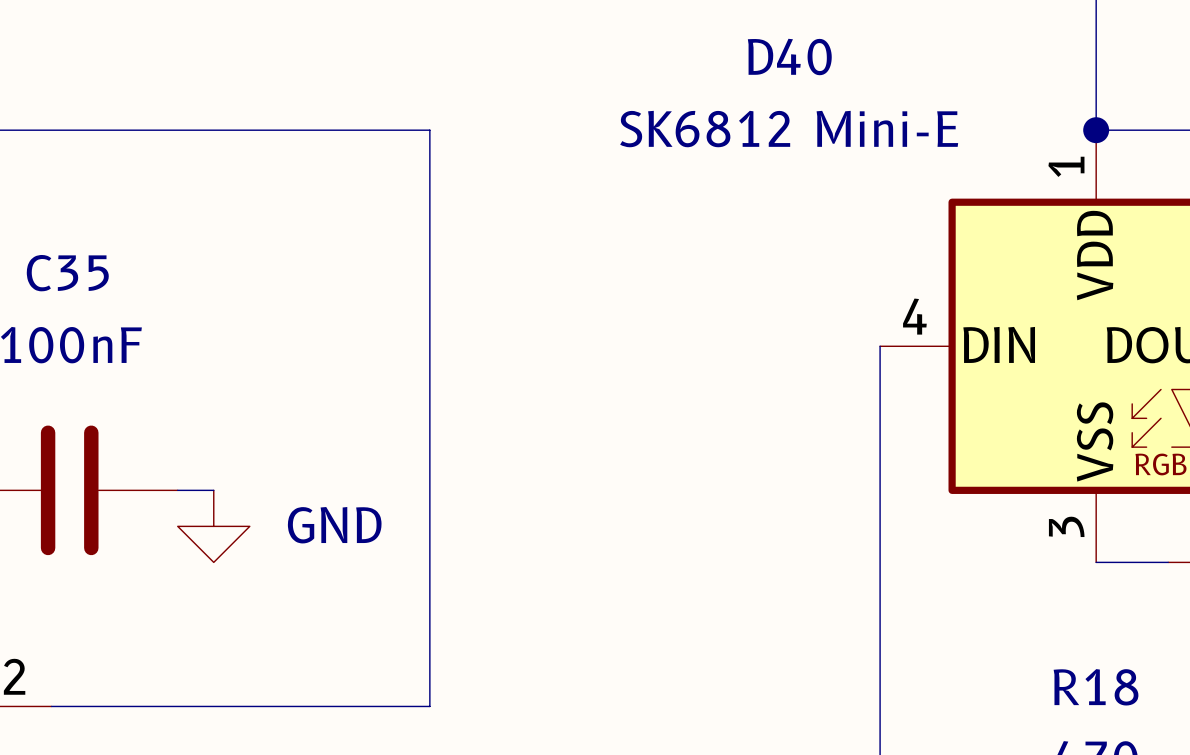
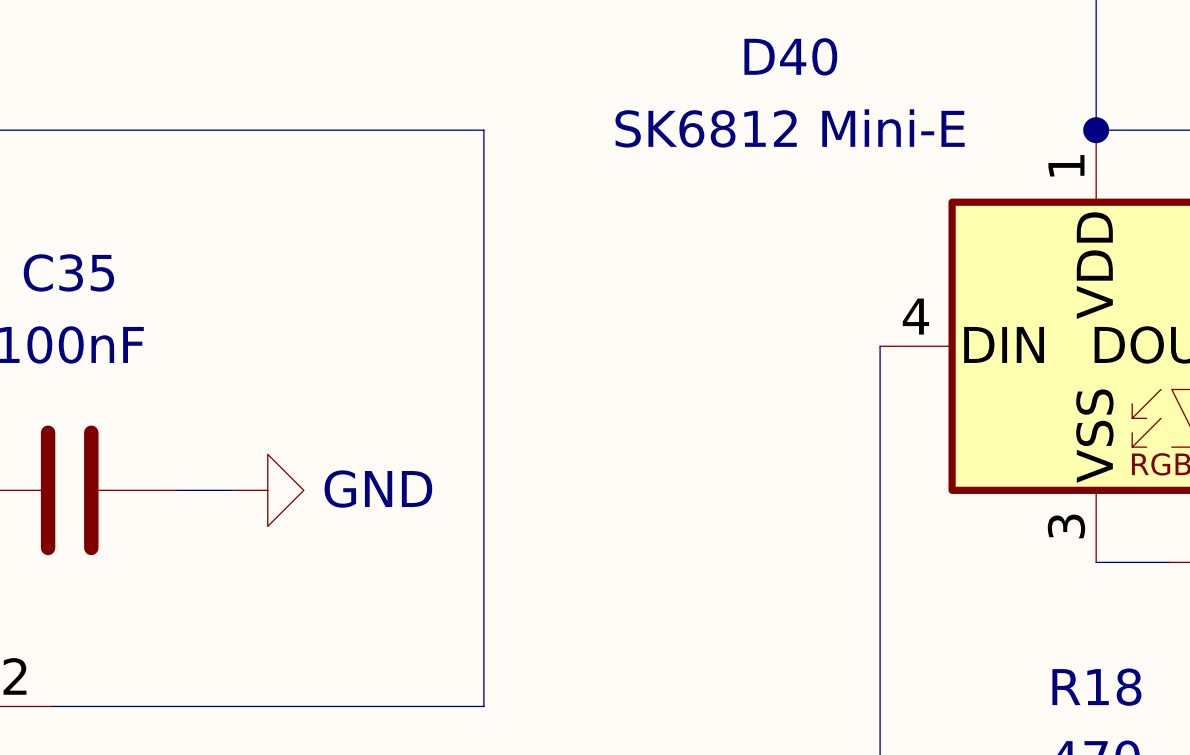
wire: (429, 130) (429, 706) -> (429, 130) (483, 130) (483, 706) (429, 706)
wire: none -> (213, 490) (231, 490)
power symbol rotation: 0° (213, 526) -> 90° counterclockwise (267, 490)
power symbol position: GND (213, 526) -> GND (267, 490)

